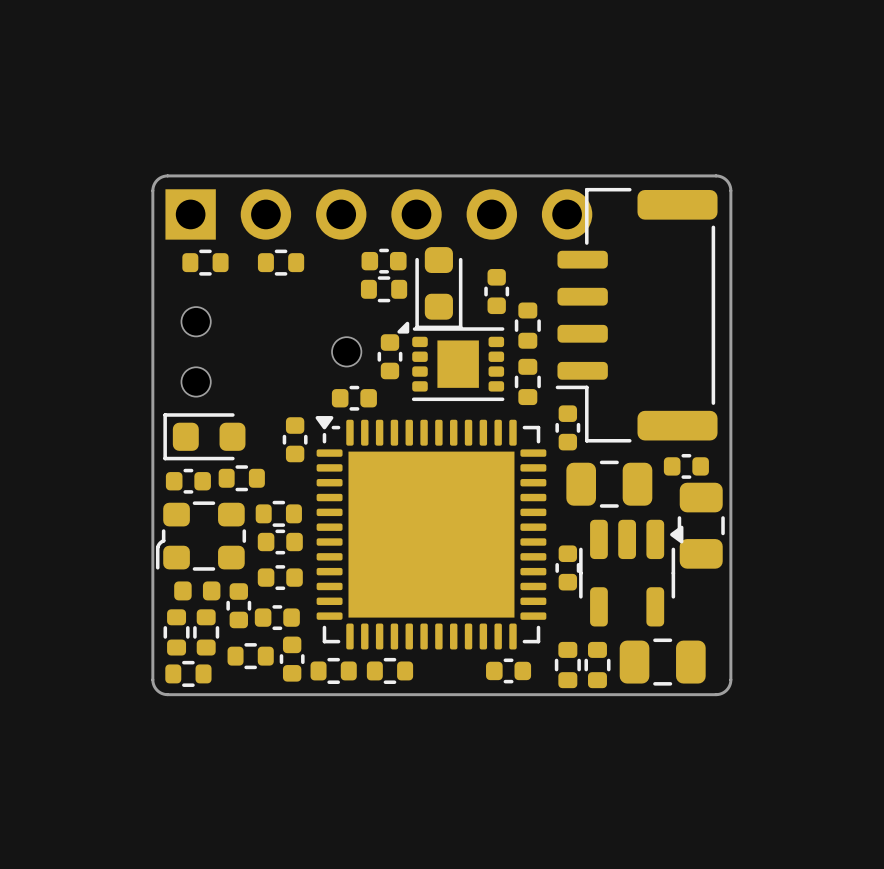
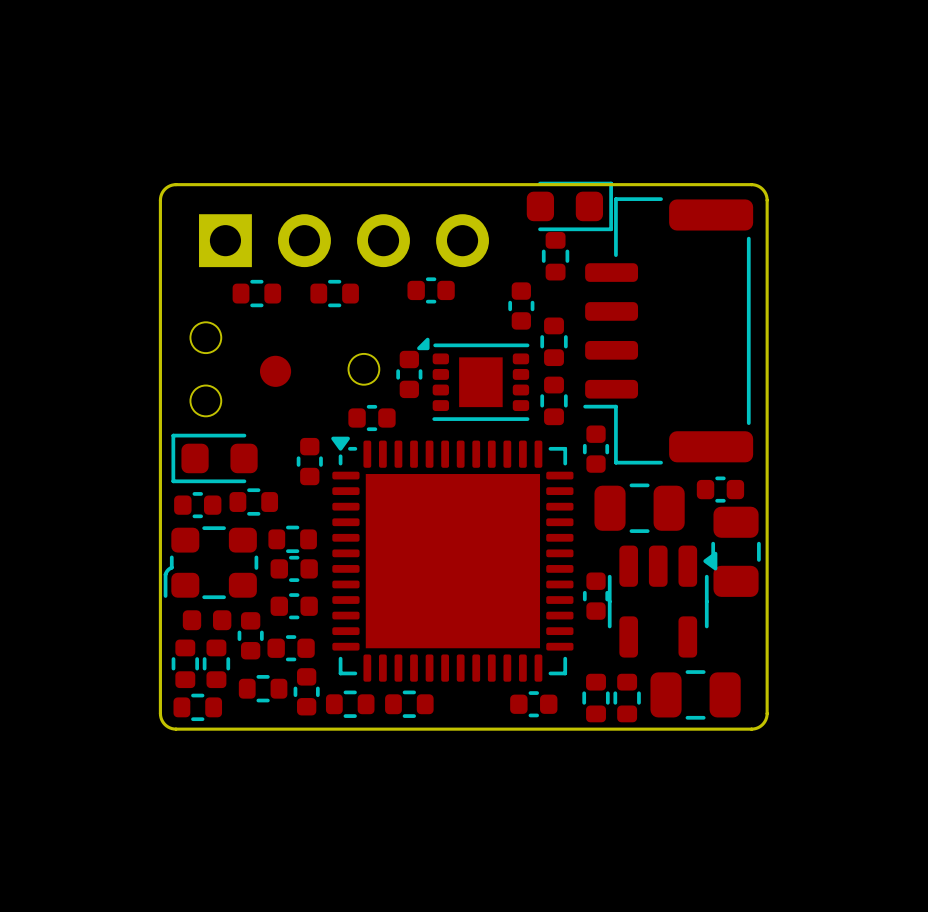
part: (378, 214) -> none
part: none -> (343, 240)
part: none -> (555, 256)
part position: (384, 261) -> (431, 290)
part: (205, 262) -> none
part: (281, 262) -> none
part: none -> (256, 293)
part: none -> (334, 293)
part rotation: 0° (438, 288) -> 90° counterclockwise (569, 206)
part position: (438, 288) -> (569, 206)
part: (384, 289) -> none
part: none -> (275, 371)

